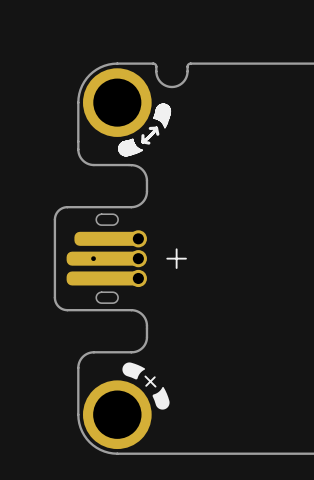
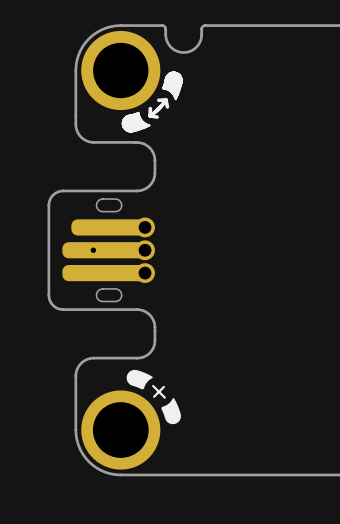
part: (120, 258) -> none

